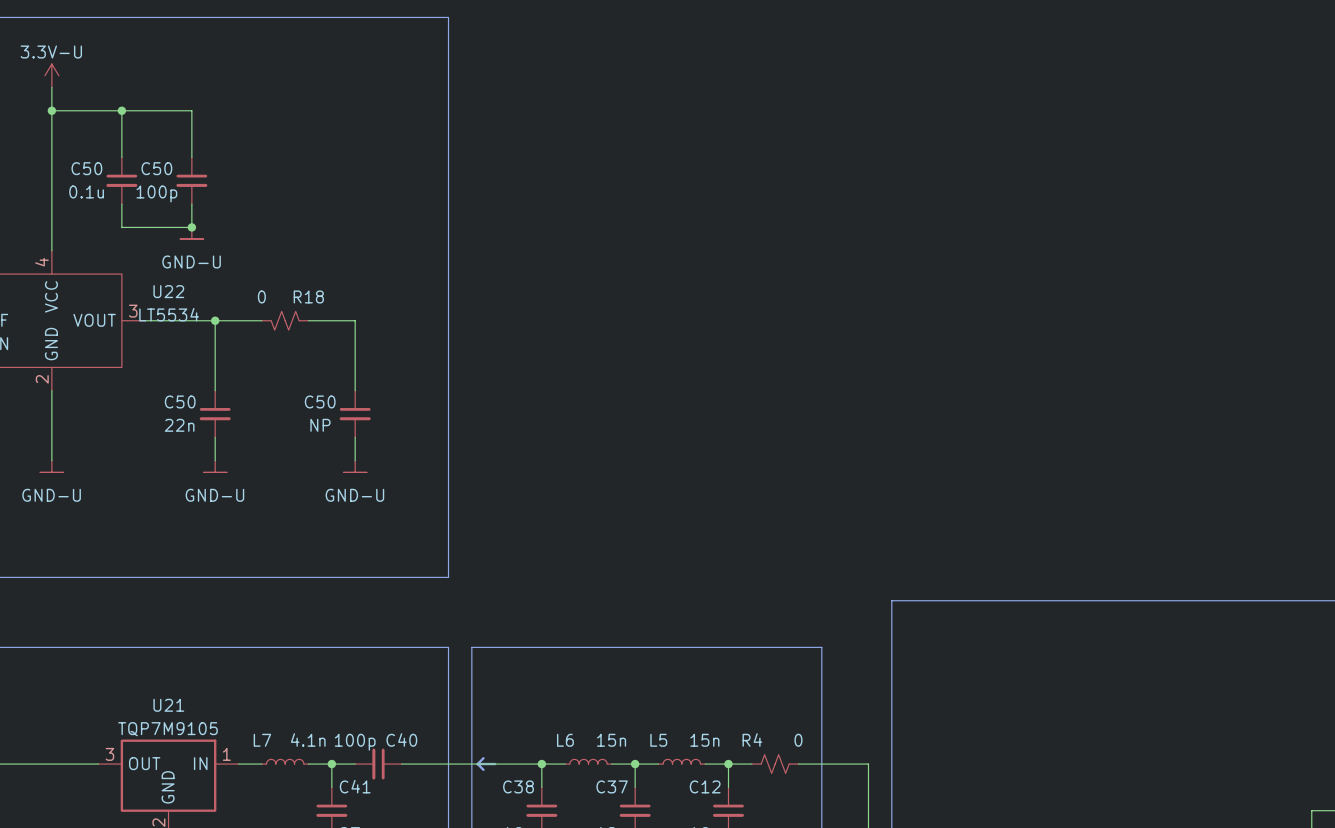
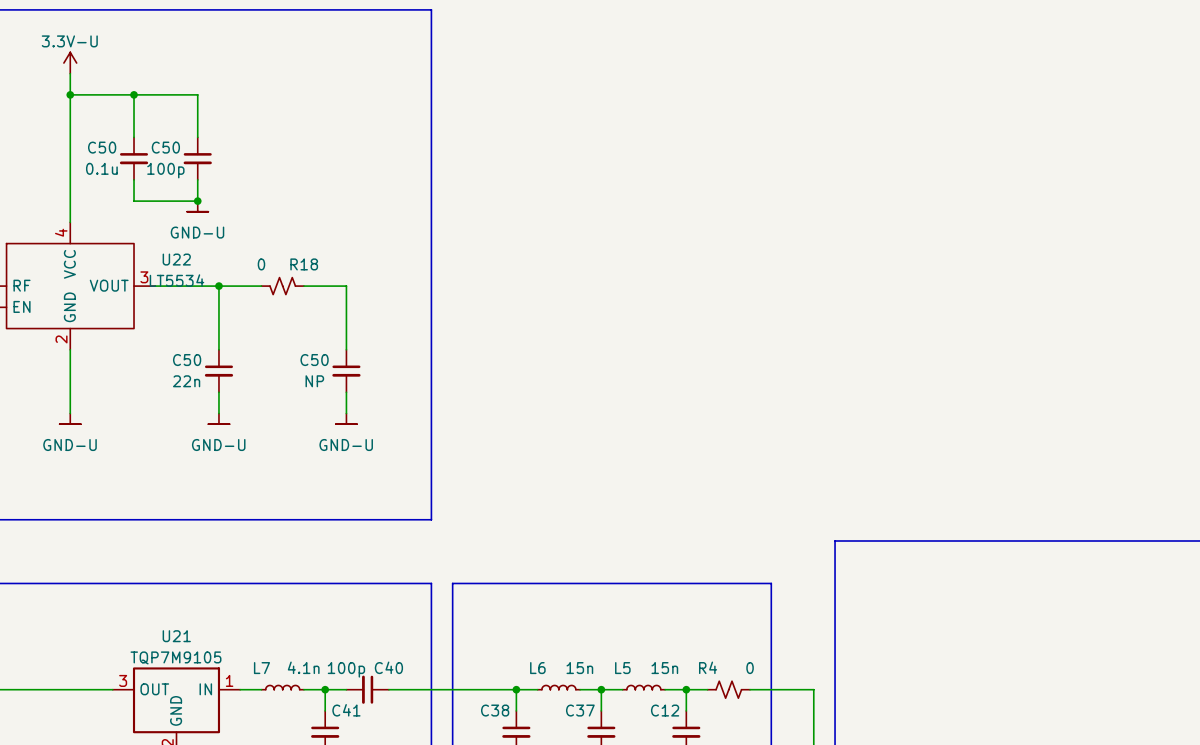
line: (483, 758) (477, 764) -> none
line: (477, 764) (495, 764) -> none
line: (477, 764) (483, 769) -> none

